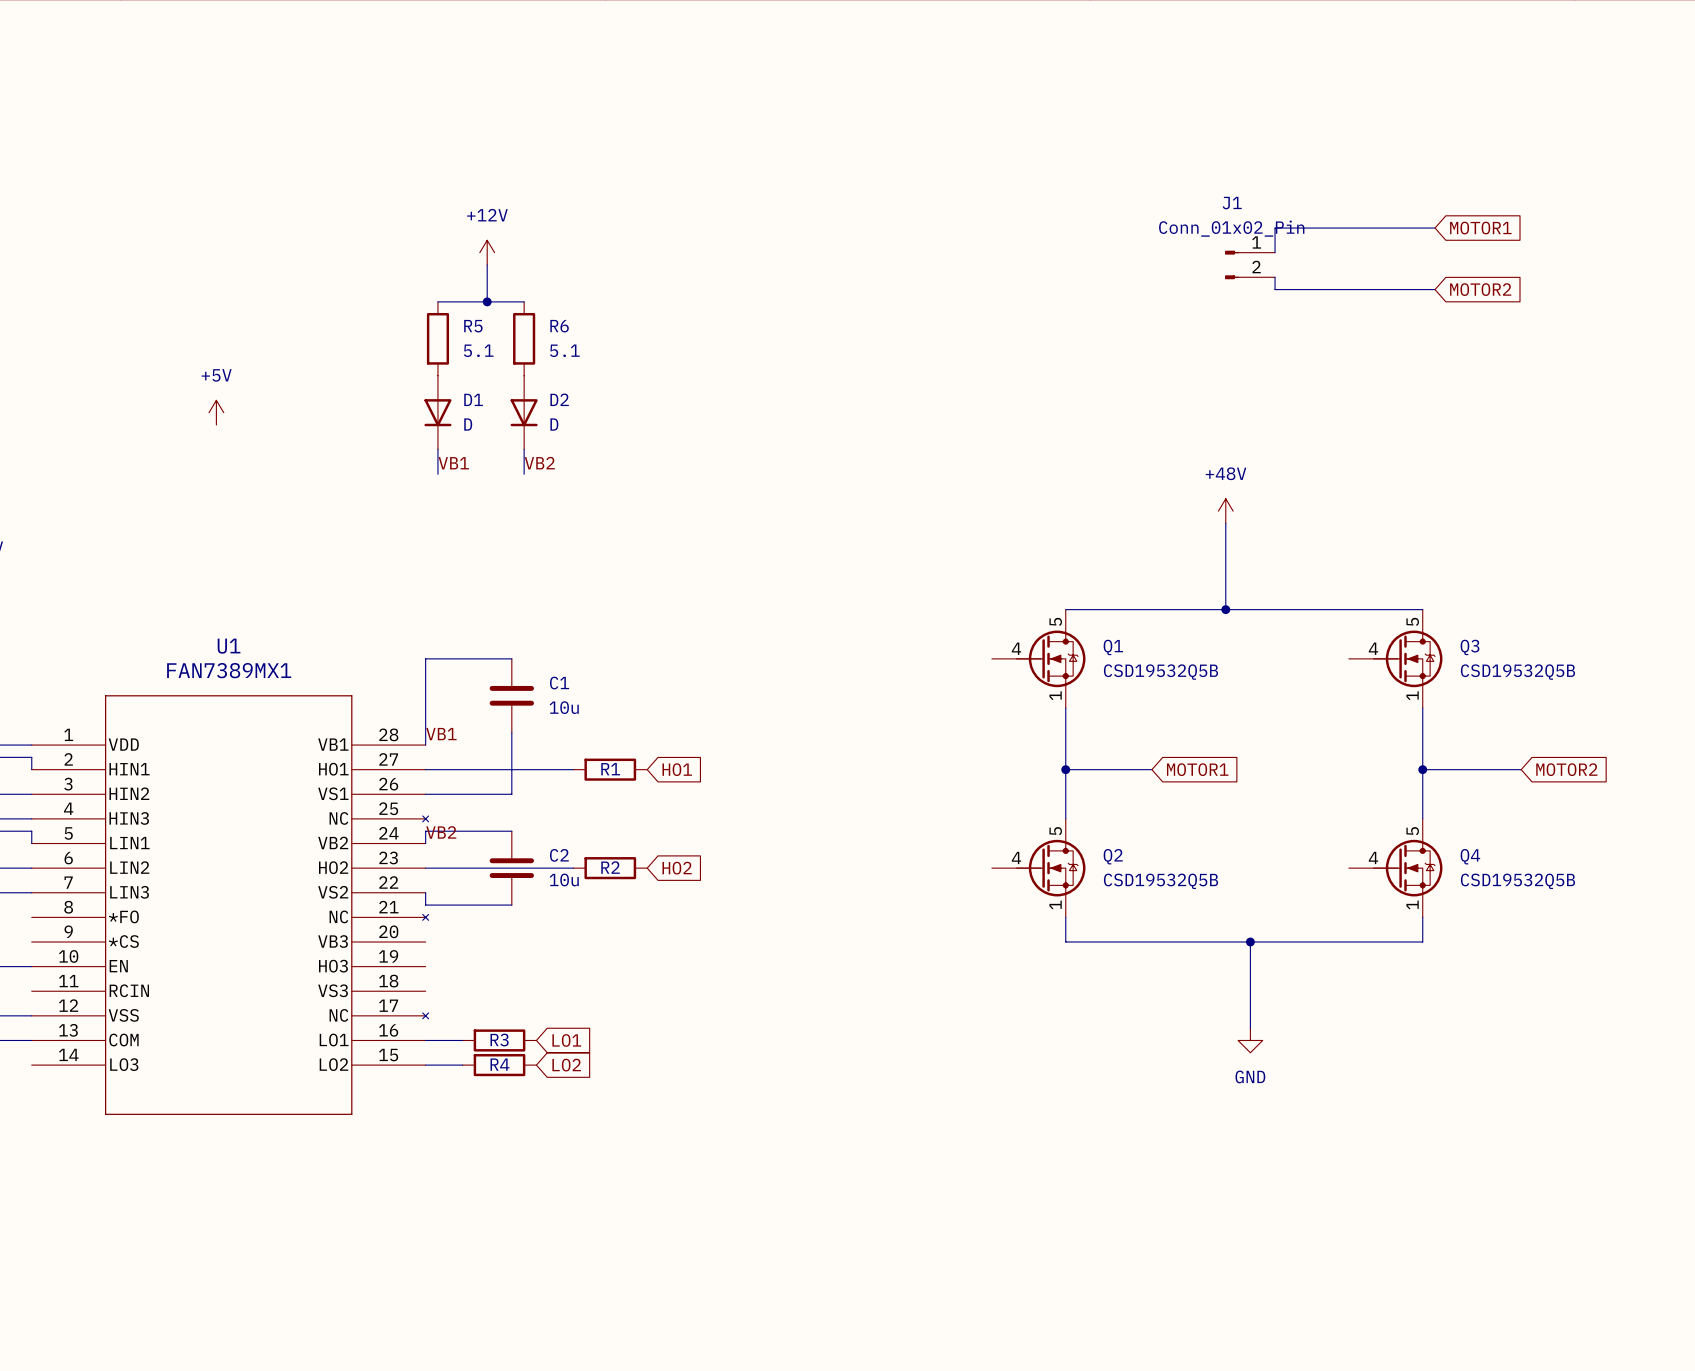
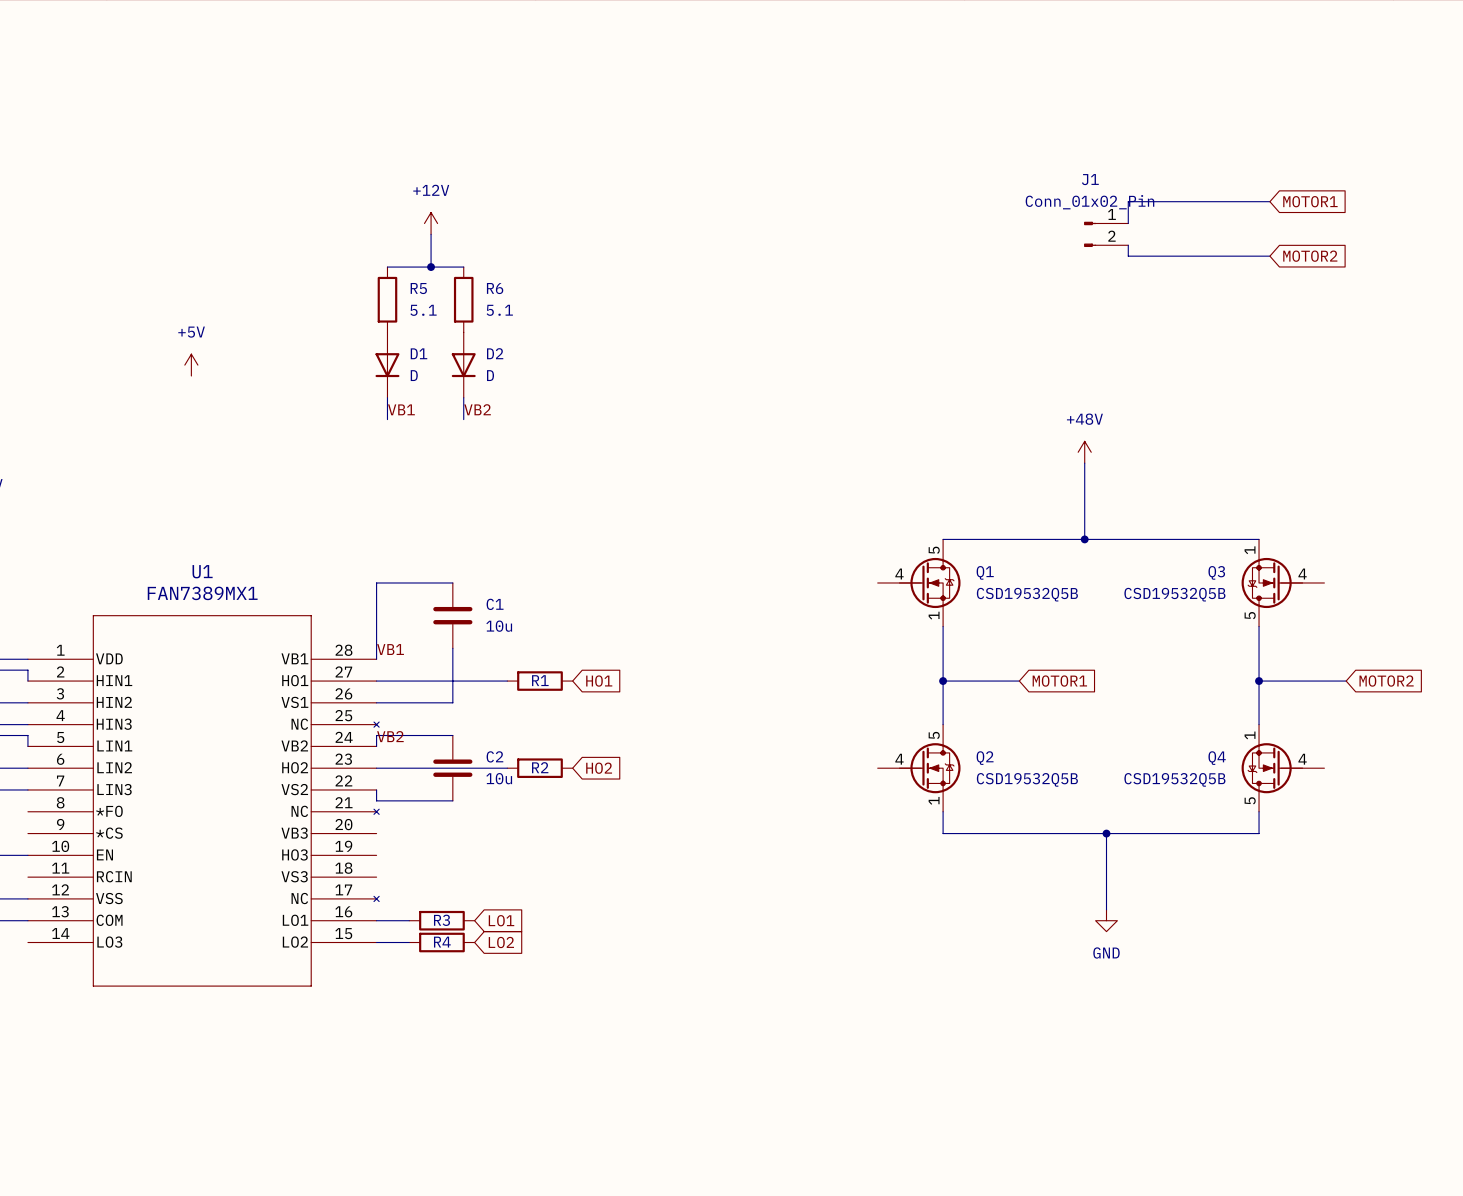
Q3 name position: Q3 (1470, 647) -> Q3 (1216, 572)
Q3 rotation: 0° (1407, 658) -> 180° (1272, 582)
Q3 value position: CSD19532Q5B (1517, 672) -> CSD19532Q5B (1174, 594)
Q4 name position: Q4 (1470, 856) -> Q4 (1217, 758)
Q4 rotation: 0° (1407, 868) -> 180° (1272, 768)
Q4 value position: CSD19532Q5B (1517, 881) -> CSD19532Q5B (1174, 779)

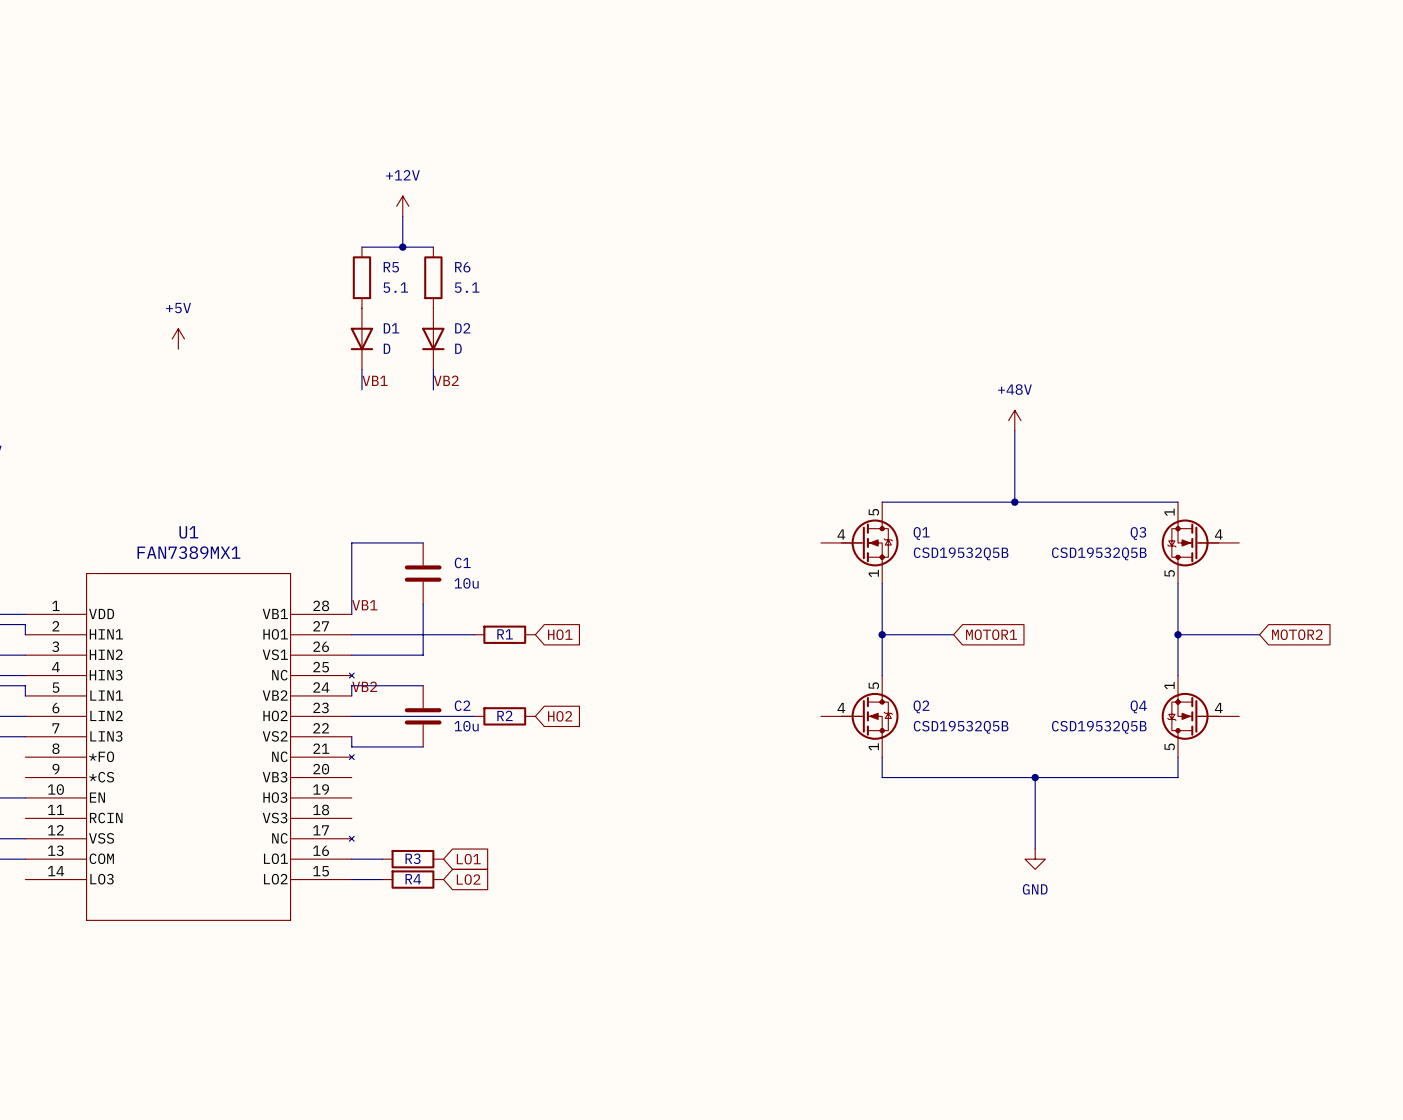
wire: (1269, 201) (1128, 201) (1128, 223) -> none
global label: MOTOR1 (1310, 201) -> none
J1: Conn_01x02_Pin (1106, 234) -> none
wire: (1128, 245) (1128, 256) (1269, 256) -> none
global label: MOTOR2 (1310, 256) -> none

